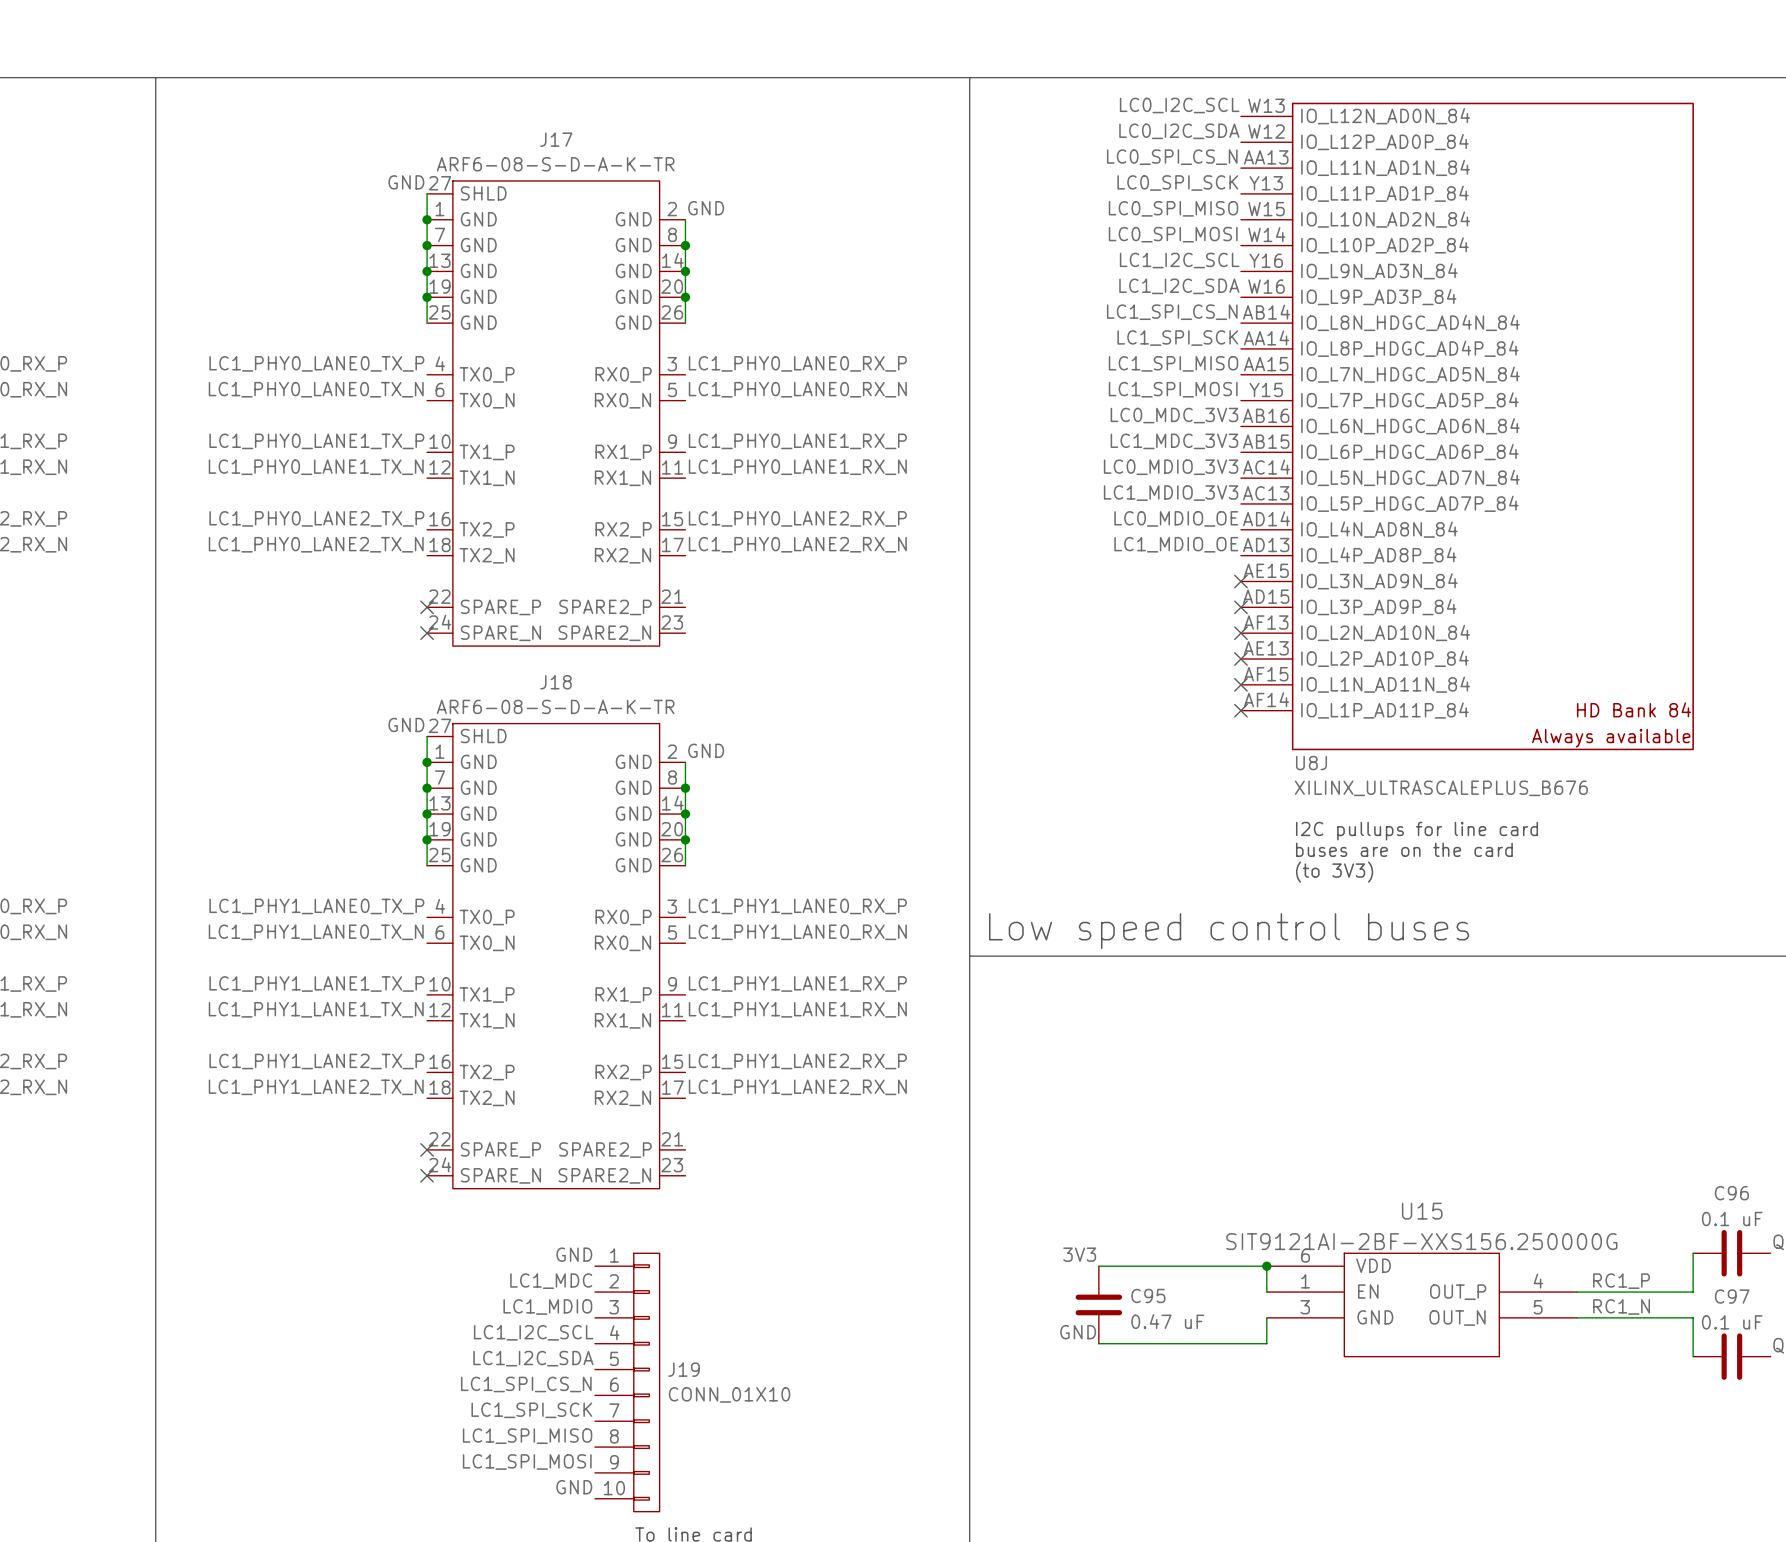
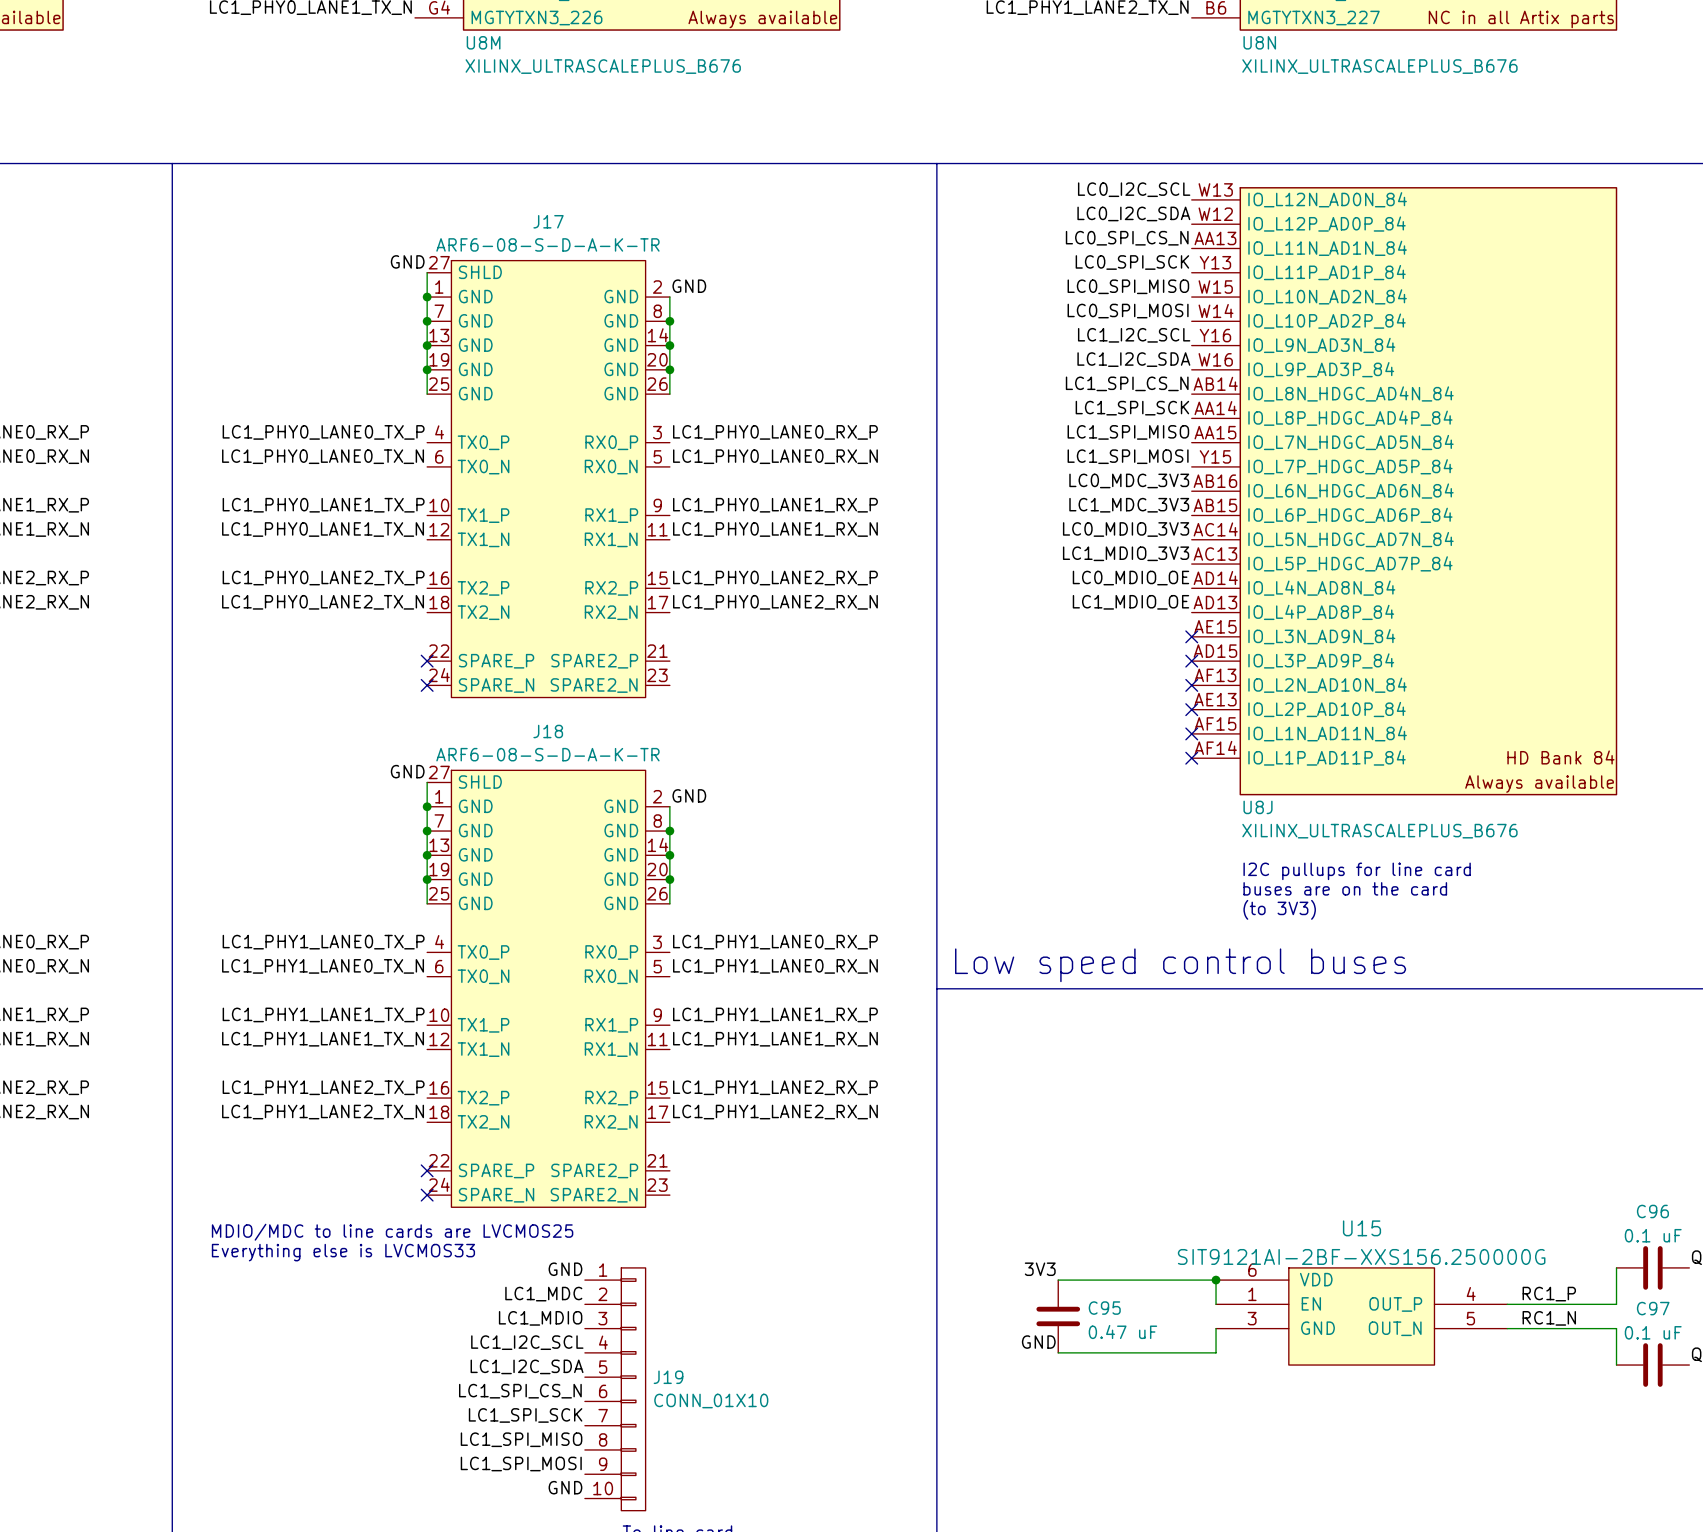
text: none -> MDIO/MDC to line cards are LVCMOS25 (392, 1232)
text: none -> Everything else is LVCMOS33 (343, 1252)

